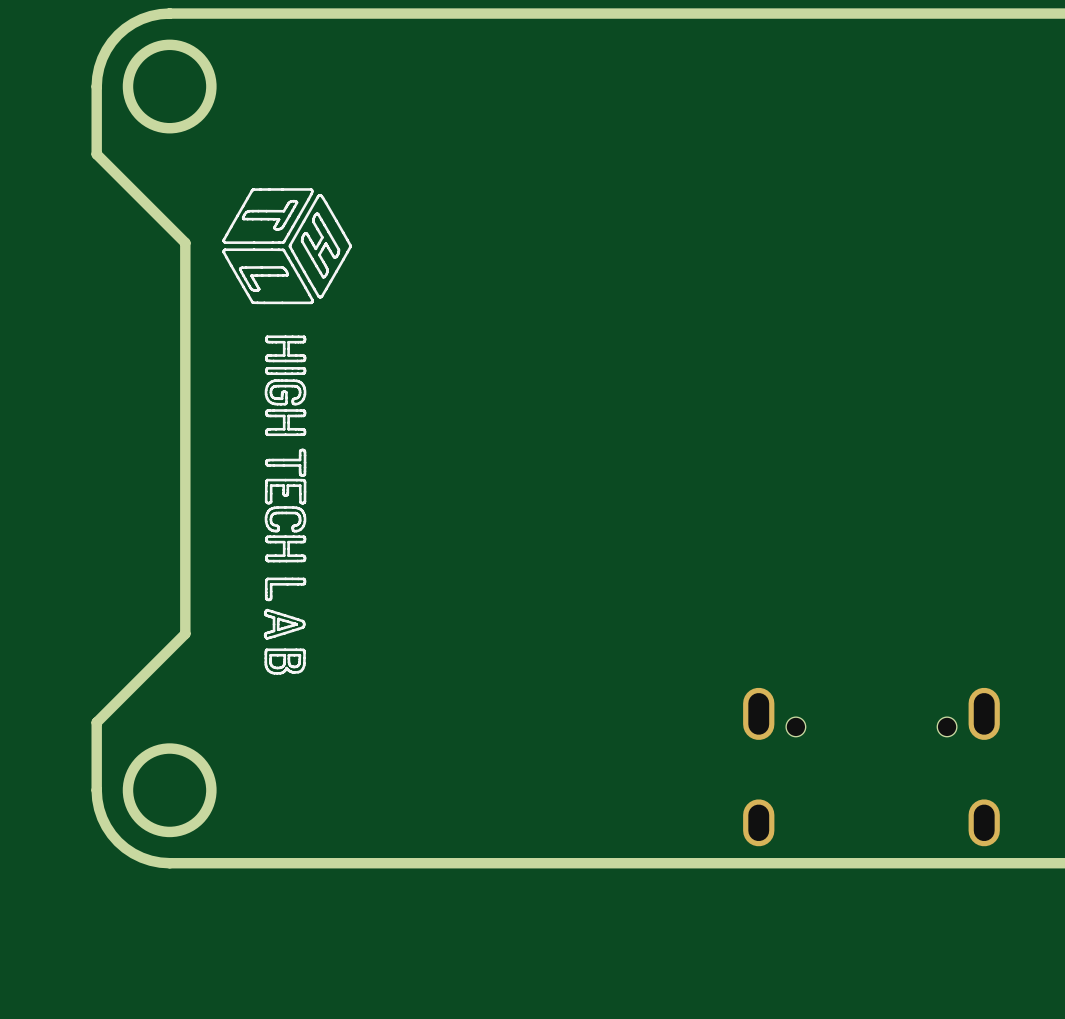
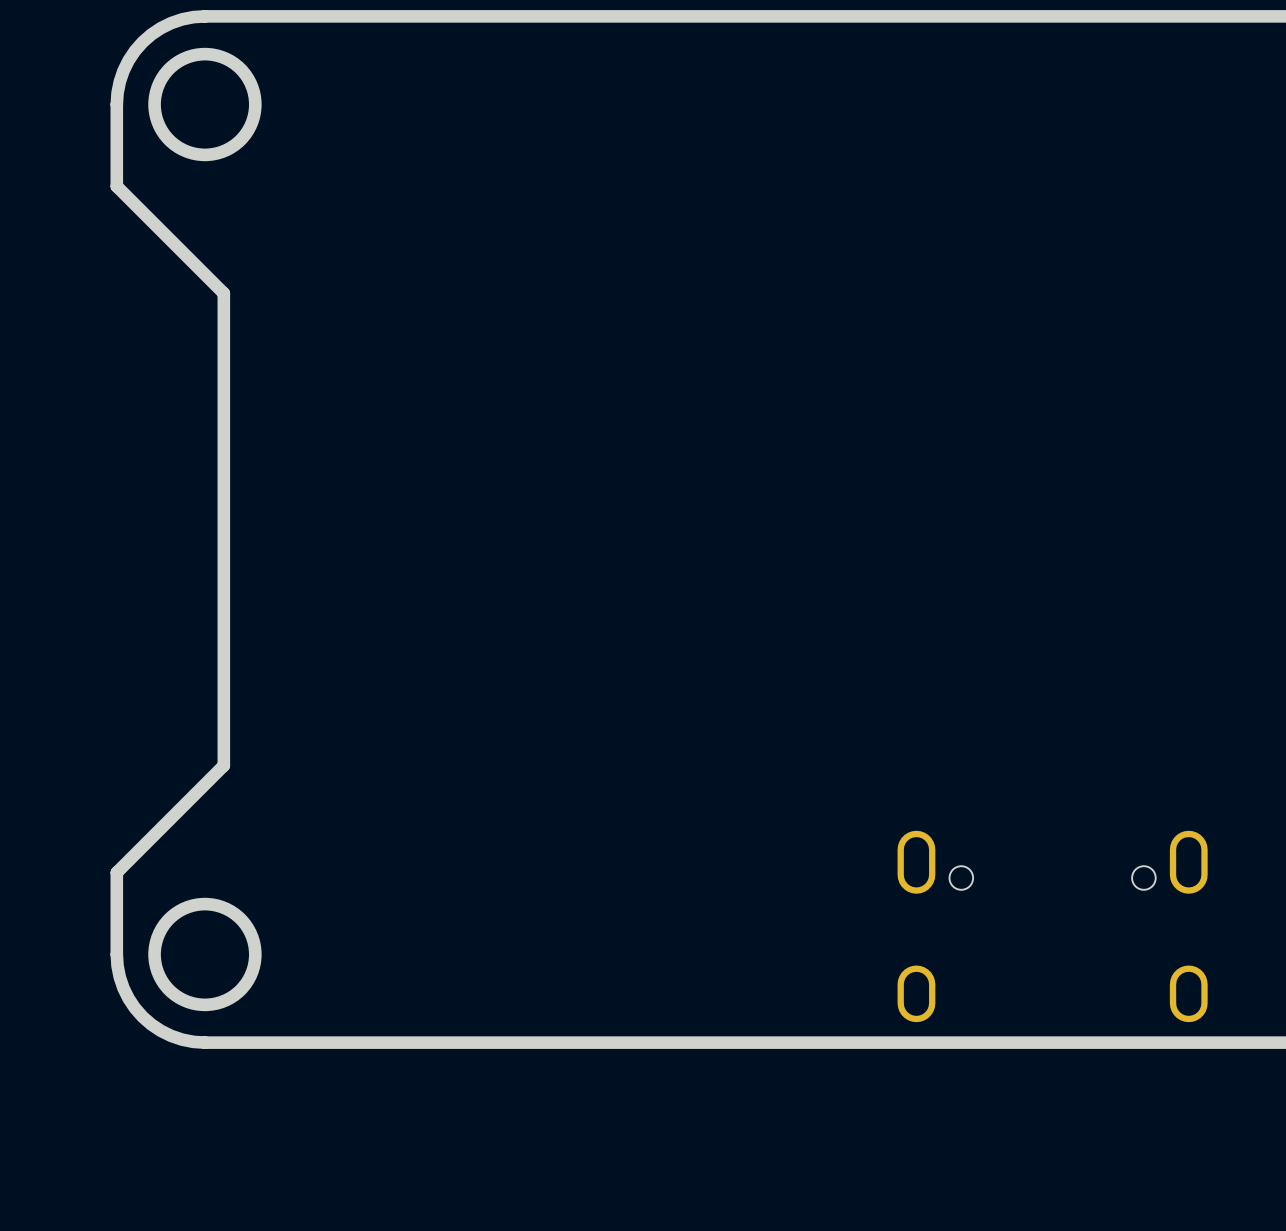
line: (311, 189) (311, 194) (283, 242) (223, 241) (252, 189) (311, 189) -> none
line: (319, 195) (350, 246) (320, 297) (289, 246) (319, 195) -> none
line: (296, 202) (282, 227) (275, 229) (274, 227) (278, 219) -> none
line: (296, 202) (289, 202) (283, 211) (248, 211) (243, 217) (278, 219) -> none
line: (317, 213) (338, 249) (334, 257) (325, 243) (319, 254) (327, 269) (323, 277) (302, 241) (303, 236) (306, 233) (315, 248) (322, 237) (313, 221) (314, 216) (317, 213) -> none
line: (278, 249) (283, 250) (312, 299) (311, 302) (252, 302) (223, 251) (225, 249) (278, 249) -> none
line: (282, 267) (287, 275) (251, 275) (259, 288) (256, 290) (251, 288) (240, 269) (282, 267) -> none
line: (303, 336) (267, 336) (267, 341) (284, 342) (284, 355) (267, 355) (266, 360) (304, 360) (303, 355) (288, 355) (288, 342) (303, 341) (303, 336) -> none
line: (303, 368) (267, 368) (266, 371) (268, 373) (303, 373) (303, 368) -> none
line: (286, 380) (297, 381) (302, 384) (305, 391) (302, 400) (297, 403) (292, 403) (293, 399) (299, 394) (299, 389) (297, 386) (276, 386) (271, 389) (271, 396) (282, 398) (282, 392) (285, 391) (286, 403) (276, 404) (270, 402) (266, 394) (268, 384) (274, 380) (286, 380) -> none
line: (304, 410) (267, 410) (267, 415) (284, 415) (284, 429) (267, 429) (267, 434) (304, 434) (303, 429) (288, 429) (288, 415) (303, 415) (304, 411) -> none
line: (303, 449) (304, 452) (304, 475) (300, 474) (300, 465) (266, 464) (267, 460) (300, 460) (300, 450) (303, 449) -> none
line: (304, 480) (267, 480) (266, 501) (271, 501) (271, 485) (283, 485) (283, 494) (285, 495) (287, 494) (287, 485) (300, 485) (300, 502) (304, 502) (304, 481) -> none
line: (293, 507) (275, 507) (269, 510) (265, 519) (268, 527) (273, 530) (278, 529) (278, 526) (271, 522) (273, 513) (295, 513) (299, 516) (299, 521) (293, 526) (293, 530) (301, 528) (304, 522) (304, 514) (300, 509) (293, 507) -> none
line: (299, 536) (267, 536) (267, 541) (284, 542) (284, 555) (267, 555) (266, 560) (304, 560) (303, 555) (288, 555) (288, 542) (304, 541) (304, 537) (299, 536) -> none
line: (303, 578) (267, 578) (266, 598) (270, 598) (271, 584) (303, 584) (303, 578) -> none
line: (267, 610) (302, 621) (303, 626) (266, 638) (265, 633) (274, 630) (274, 617) (265, 614) (267, 610) -> none
line: (296, 624) (278, 629) (278, 619) (296, 624) -> none
line: (303, 650) (266, 649) (266, 667) (274, 673) (282, 672) (286, 668) (292, 672) (299, 671) (304, 665) (304, 650) -> none
line: (284, 655) (270, 655) (271, 665) (276, 667) (282, 666) (284, 655) -> none
line: (299, 655) (288, 655) (290, 665) (298, 665) (299, 655) -> none

